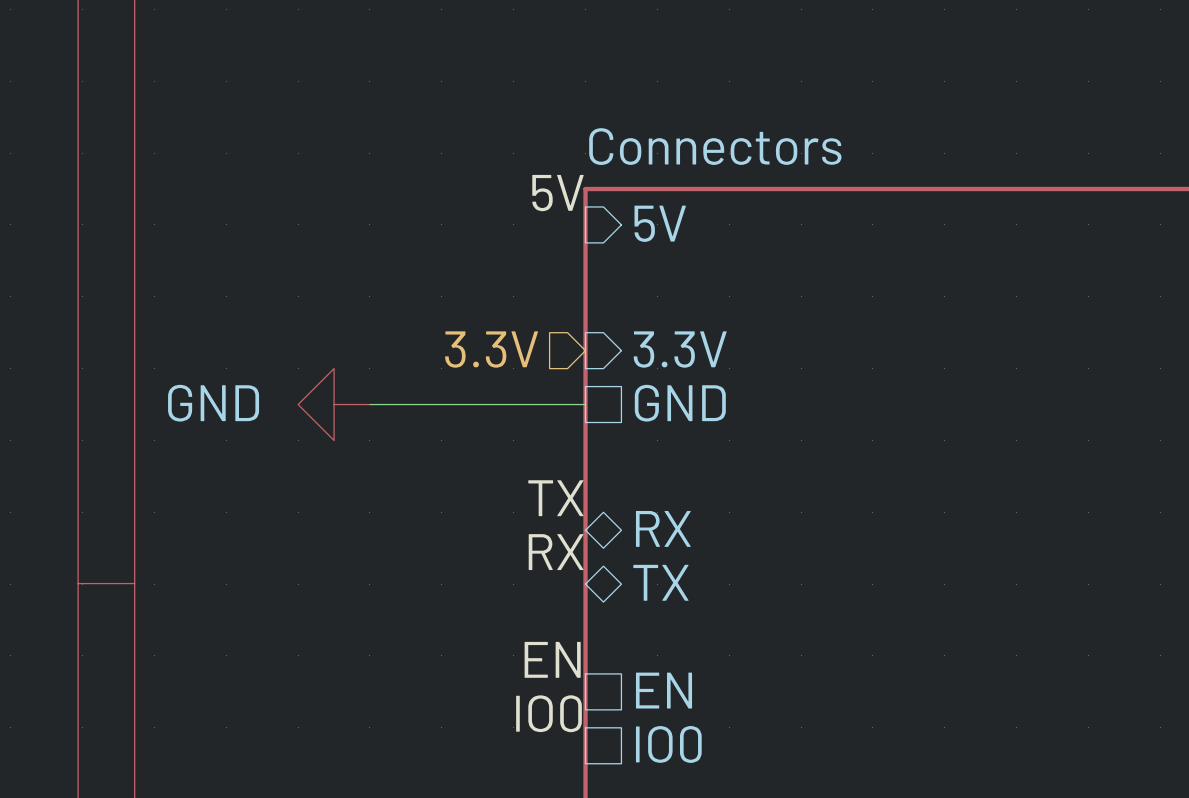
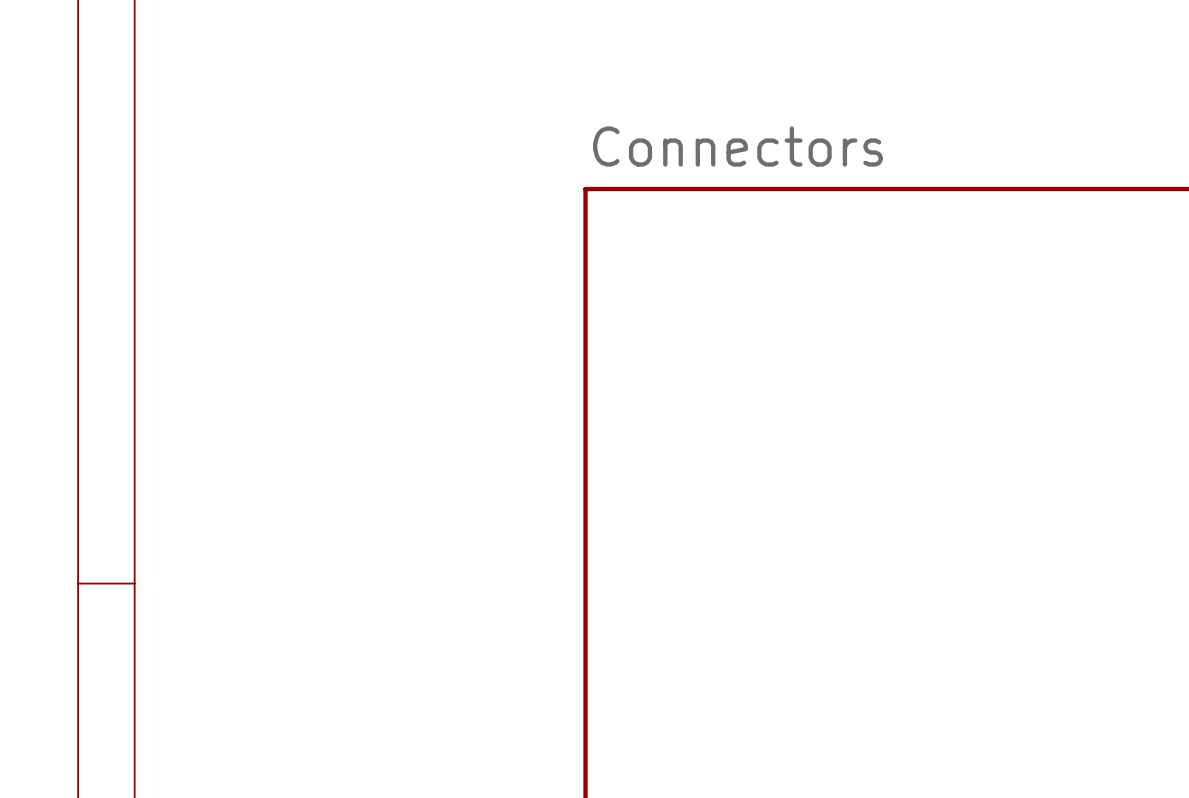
label: 5V (558, 193) -> none
sheet pin: 5V (660, 223) -> none
hierarchical label: 3.3V (491, 349) -> none
sheet pin: 3.3V (680, 349) -> none
sheet pin: GND (680, 403) -> none
power symbol: GND (334, 404) -> none
wire: (369, 404) (585, 404) -> none
label: TX (555, 498) -> none
sheet pin: RX (663, 528) -> none
label: RX (556, 552) -> none
sheet pin: TX (660, 582) -> none
label: EN (552, 659) -> none
sheet pin: EN (664, 690) -> none
label: IO0 (549, 713) -> none
sheet pin: IO0 (668, 744) -> none

